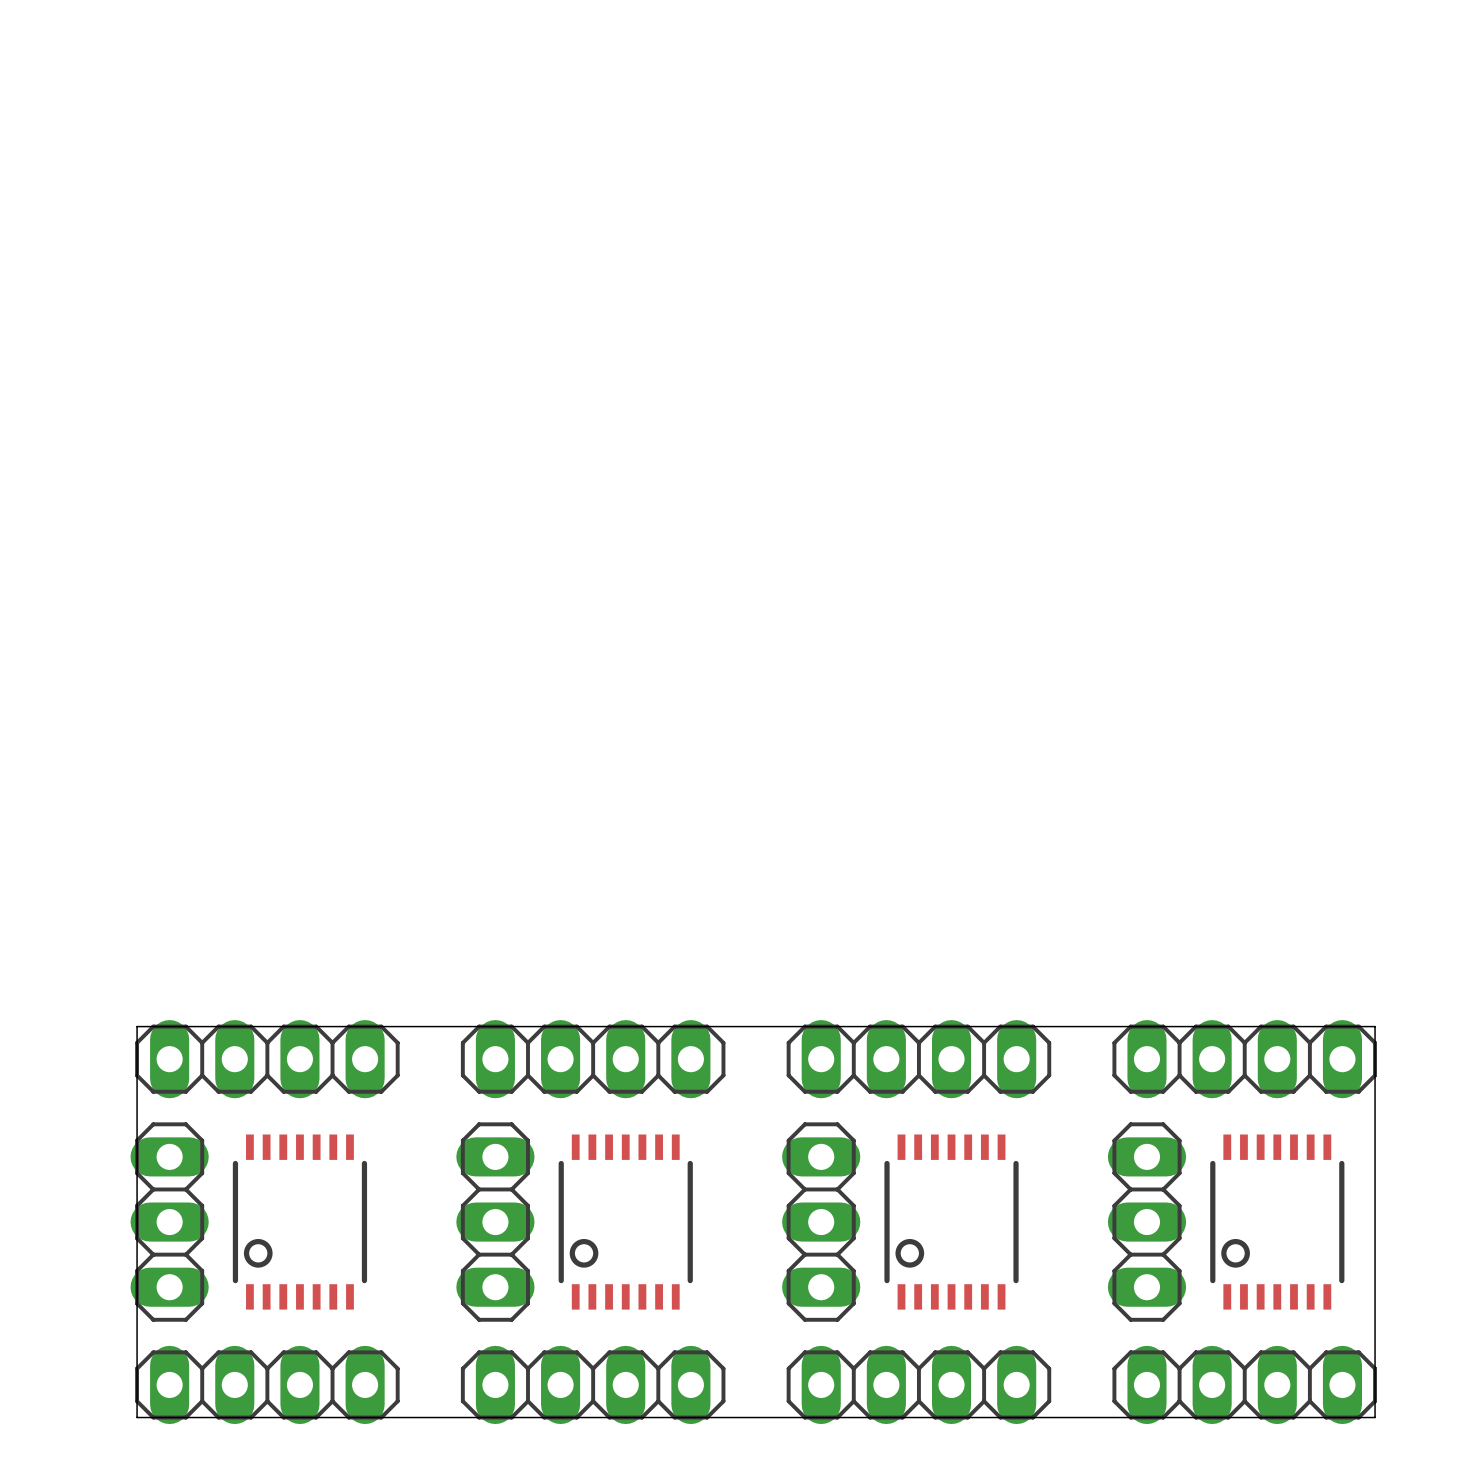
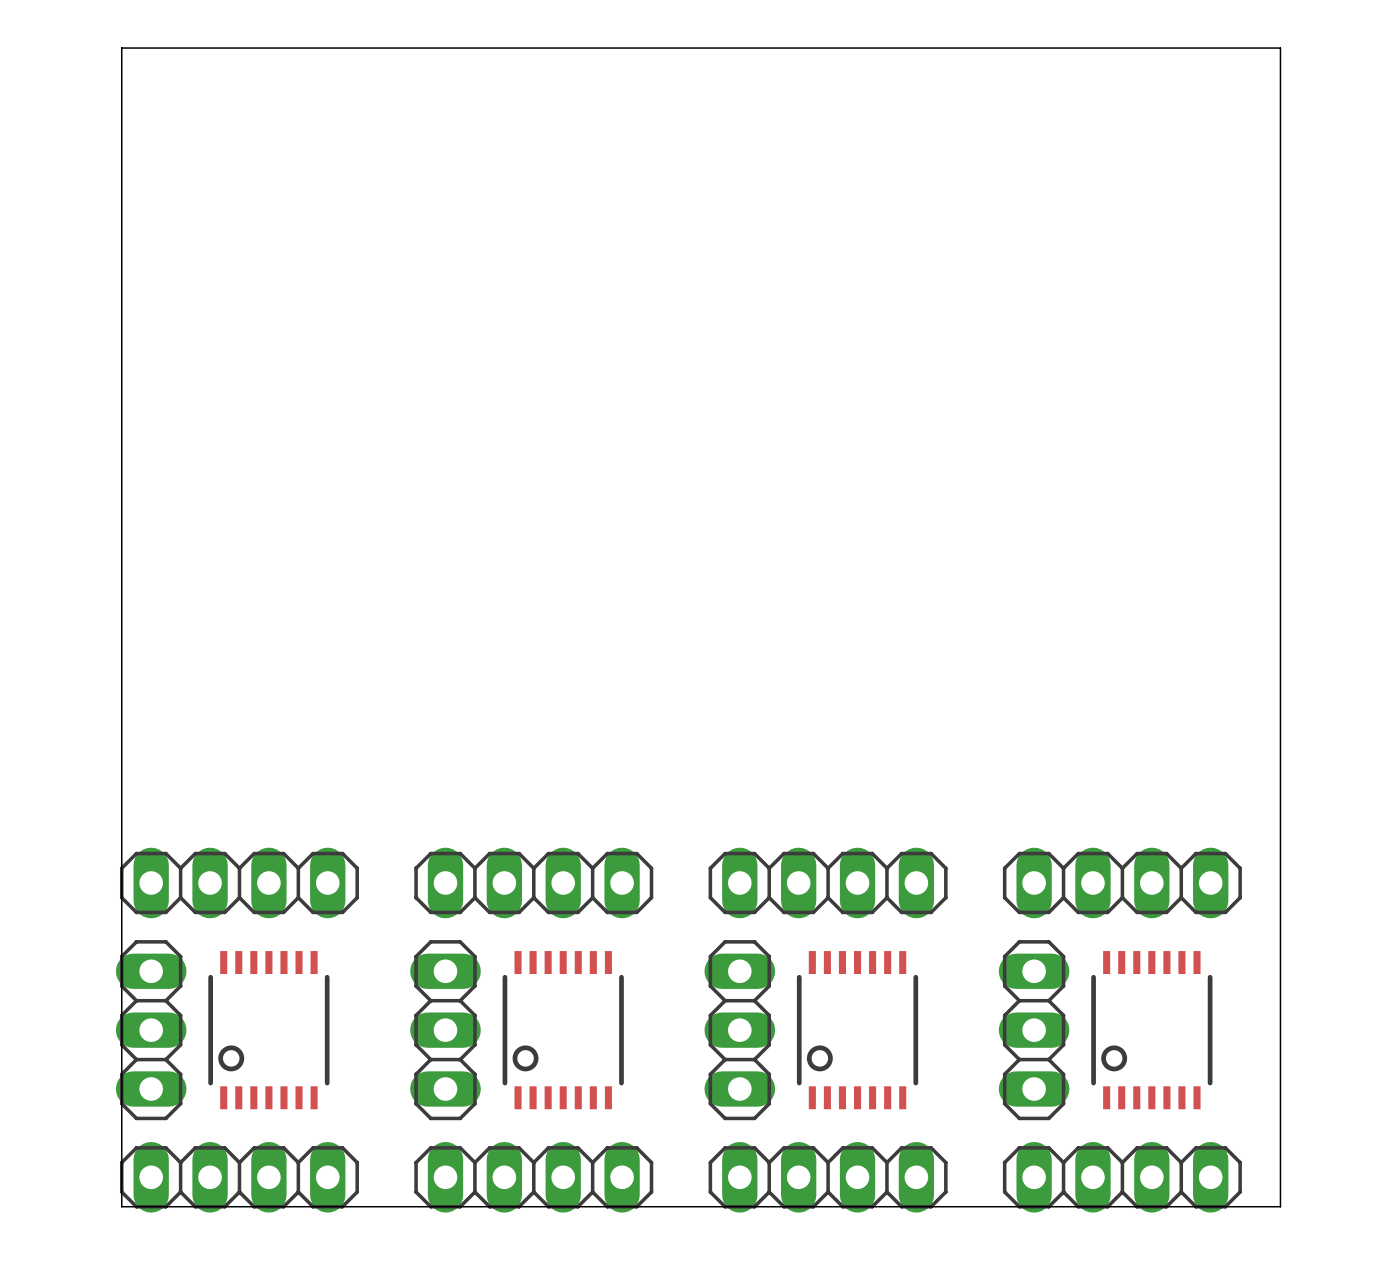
board edge: (137, 1026) (1375, 1026) (1375, 1417) -> (121, 853) (121, 48) (1280, 48) (1280, 1206) (1240, 1206)

